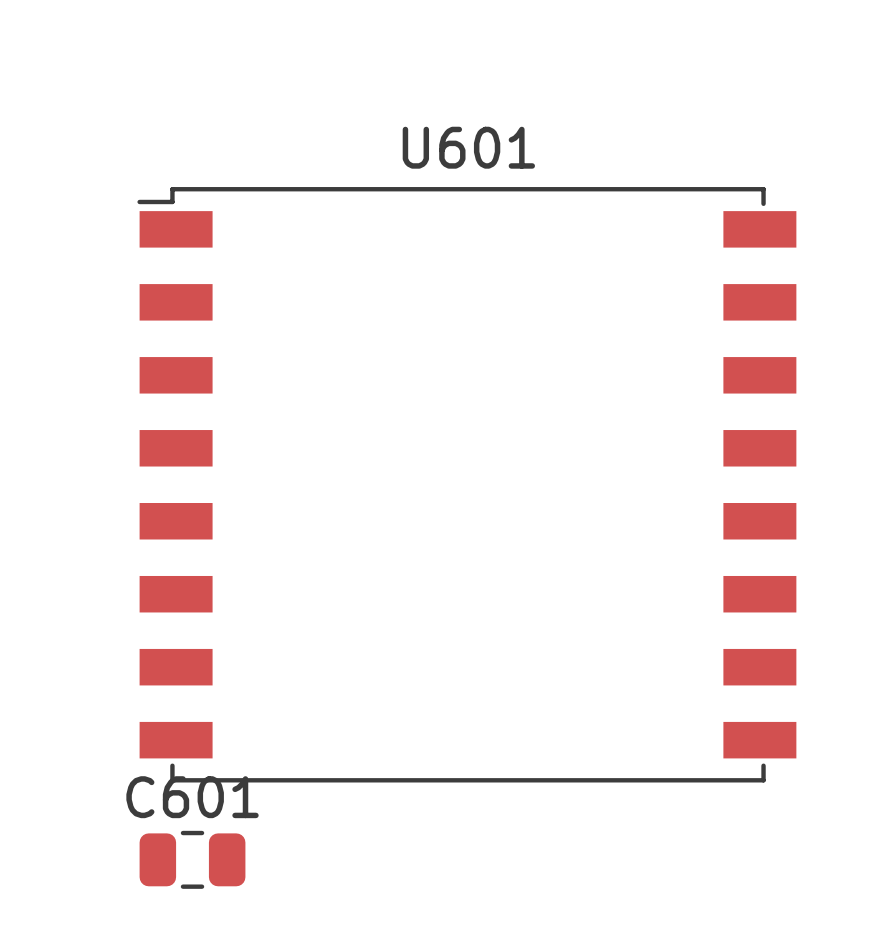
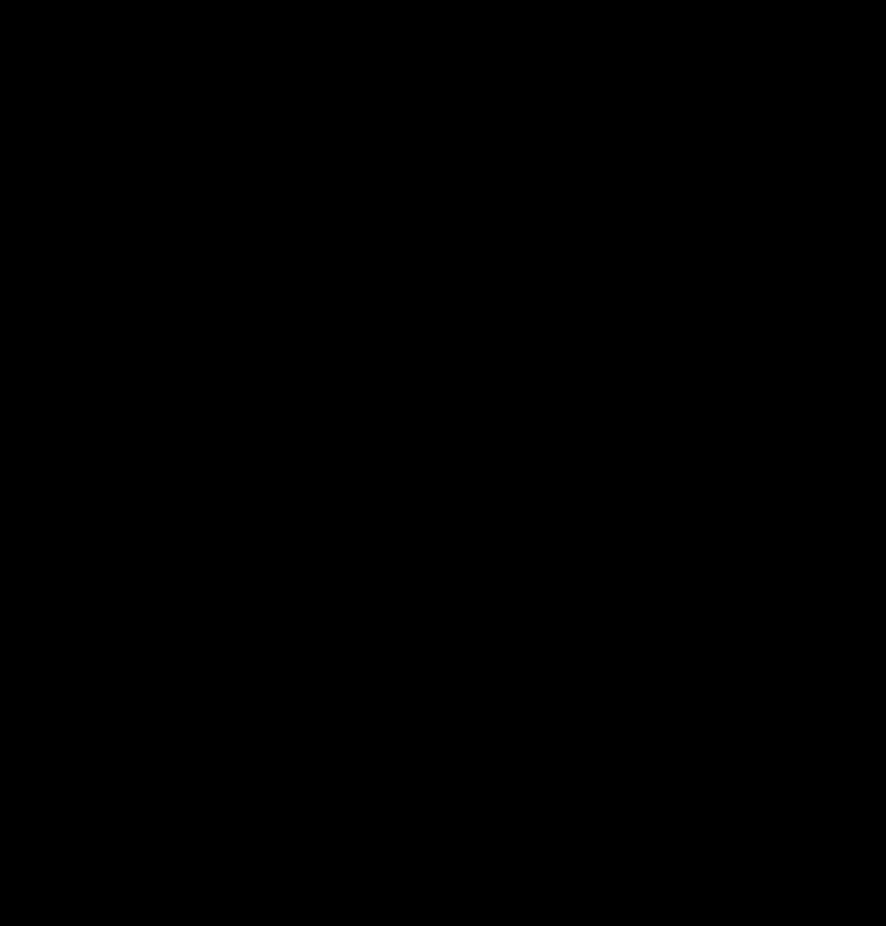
U601: (466, 484) -> none
C601: (192, 859) -> none

